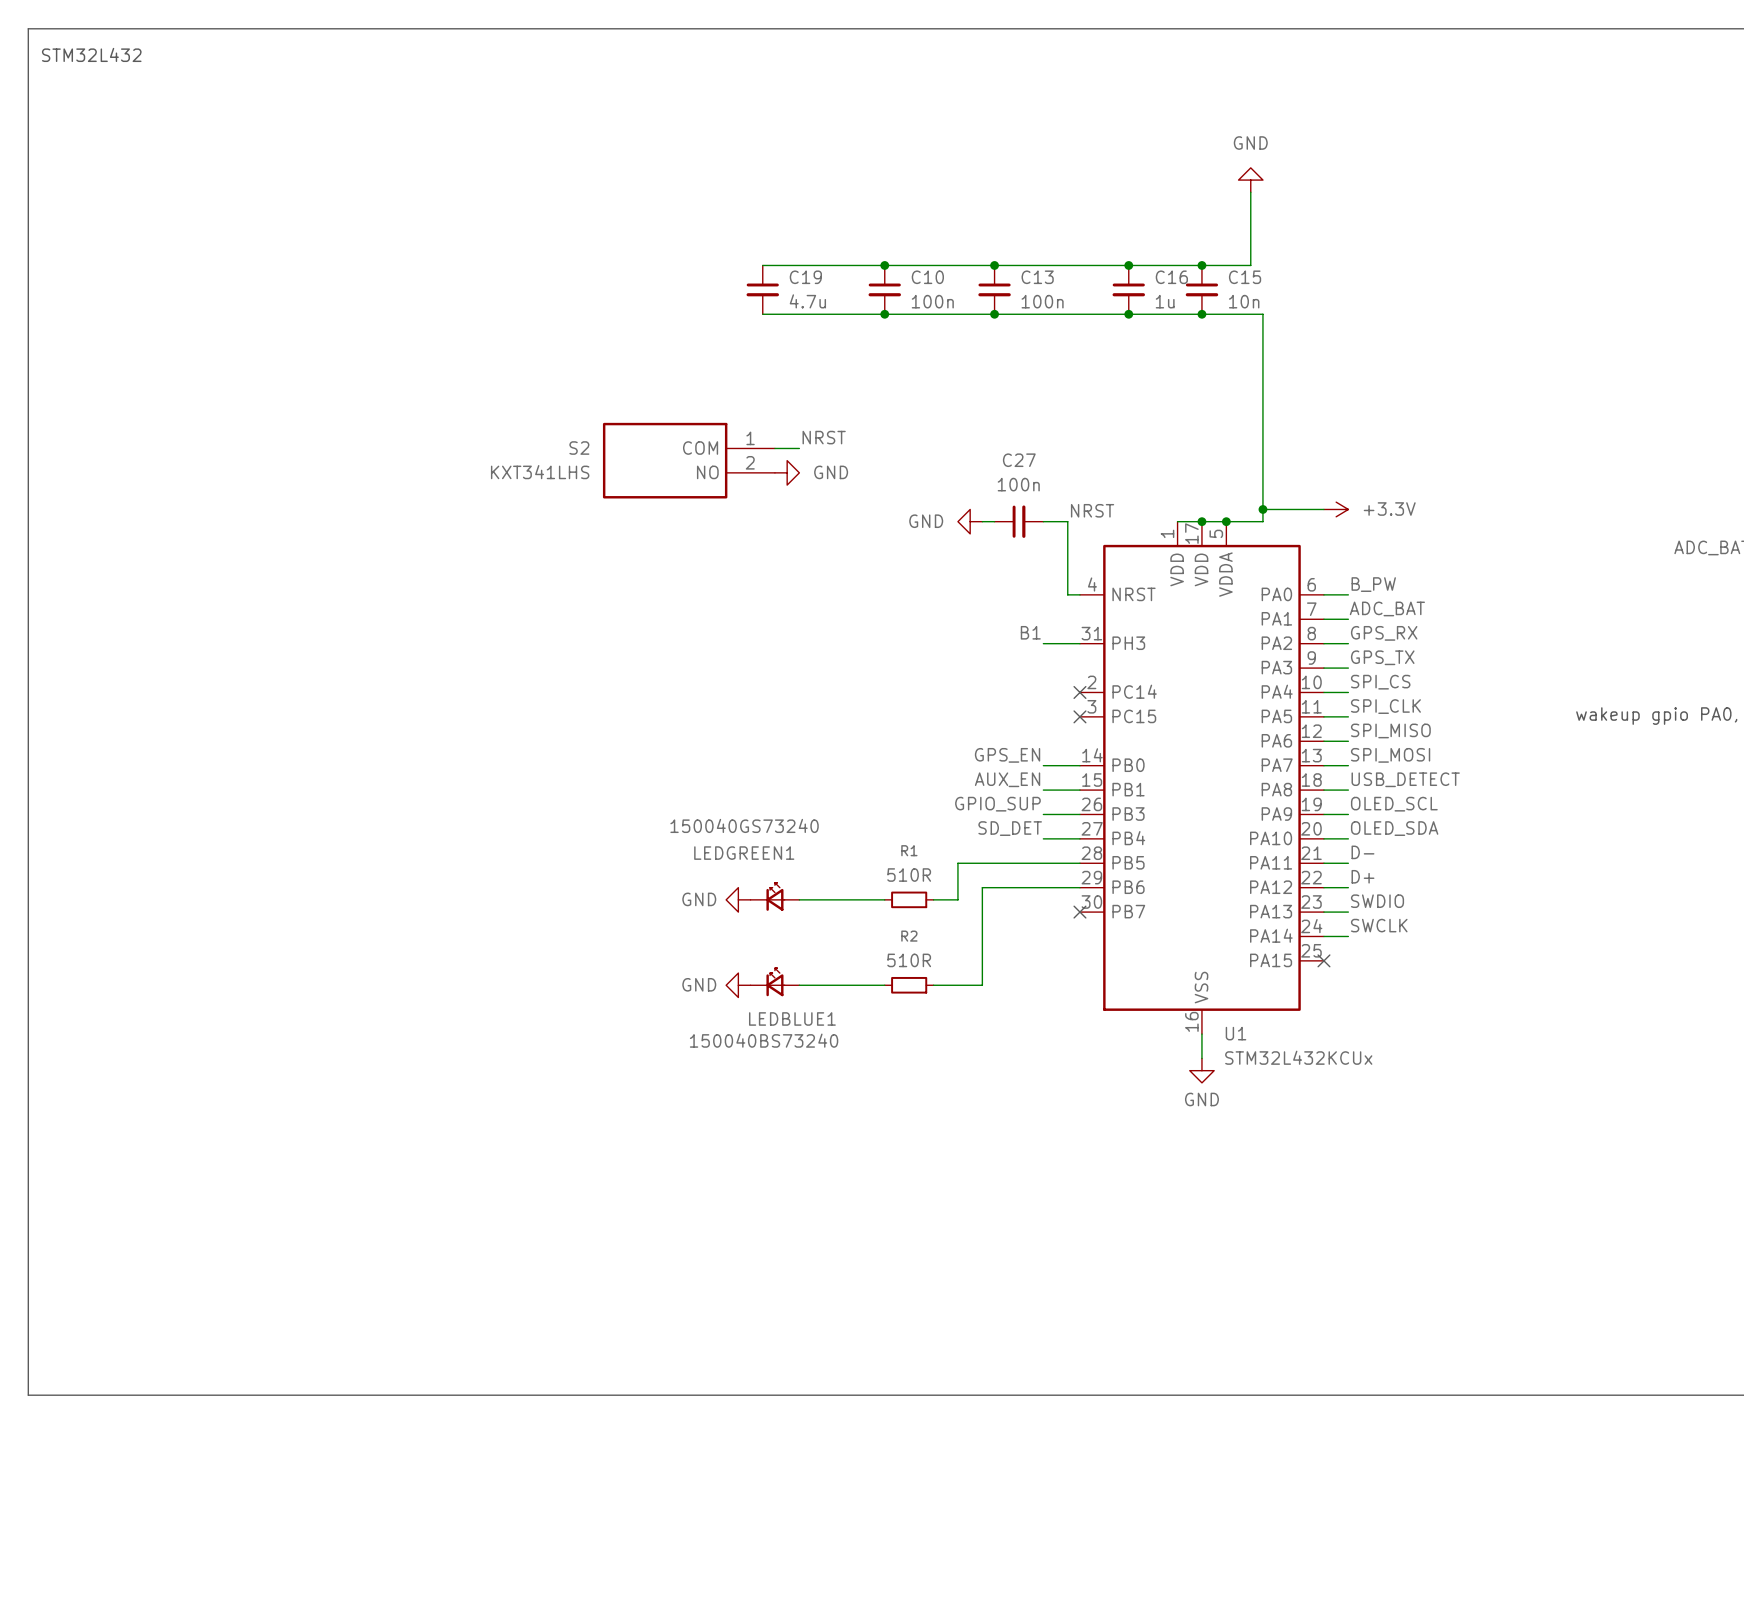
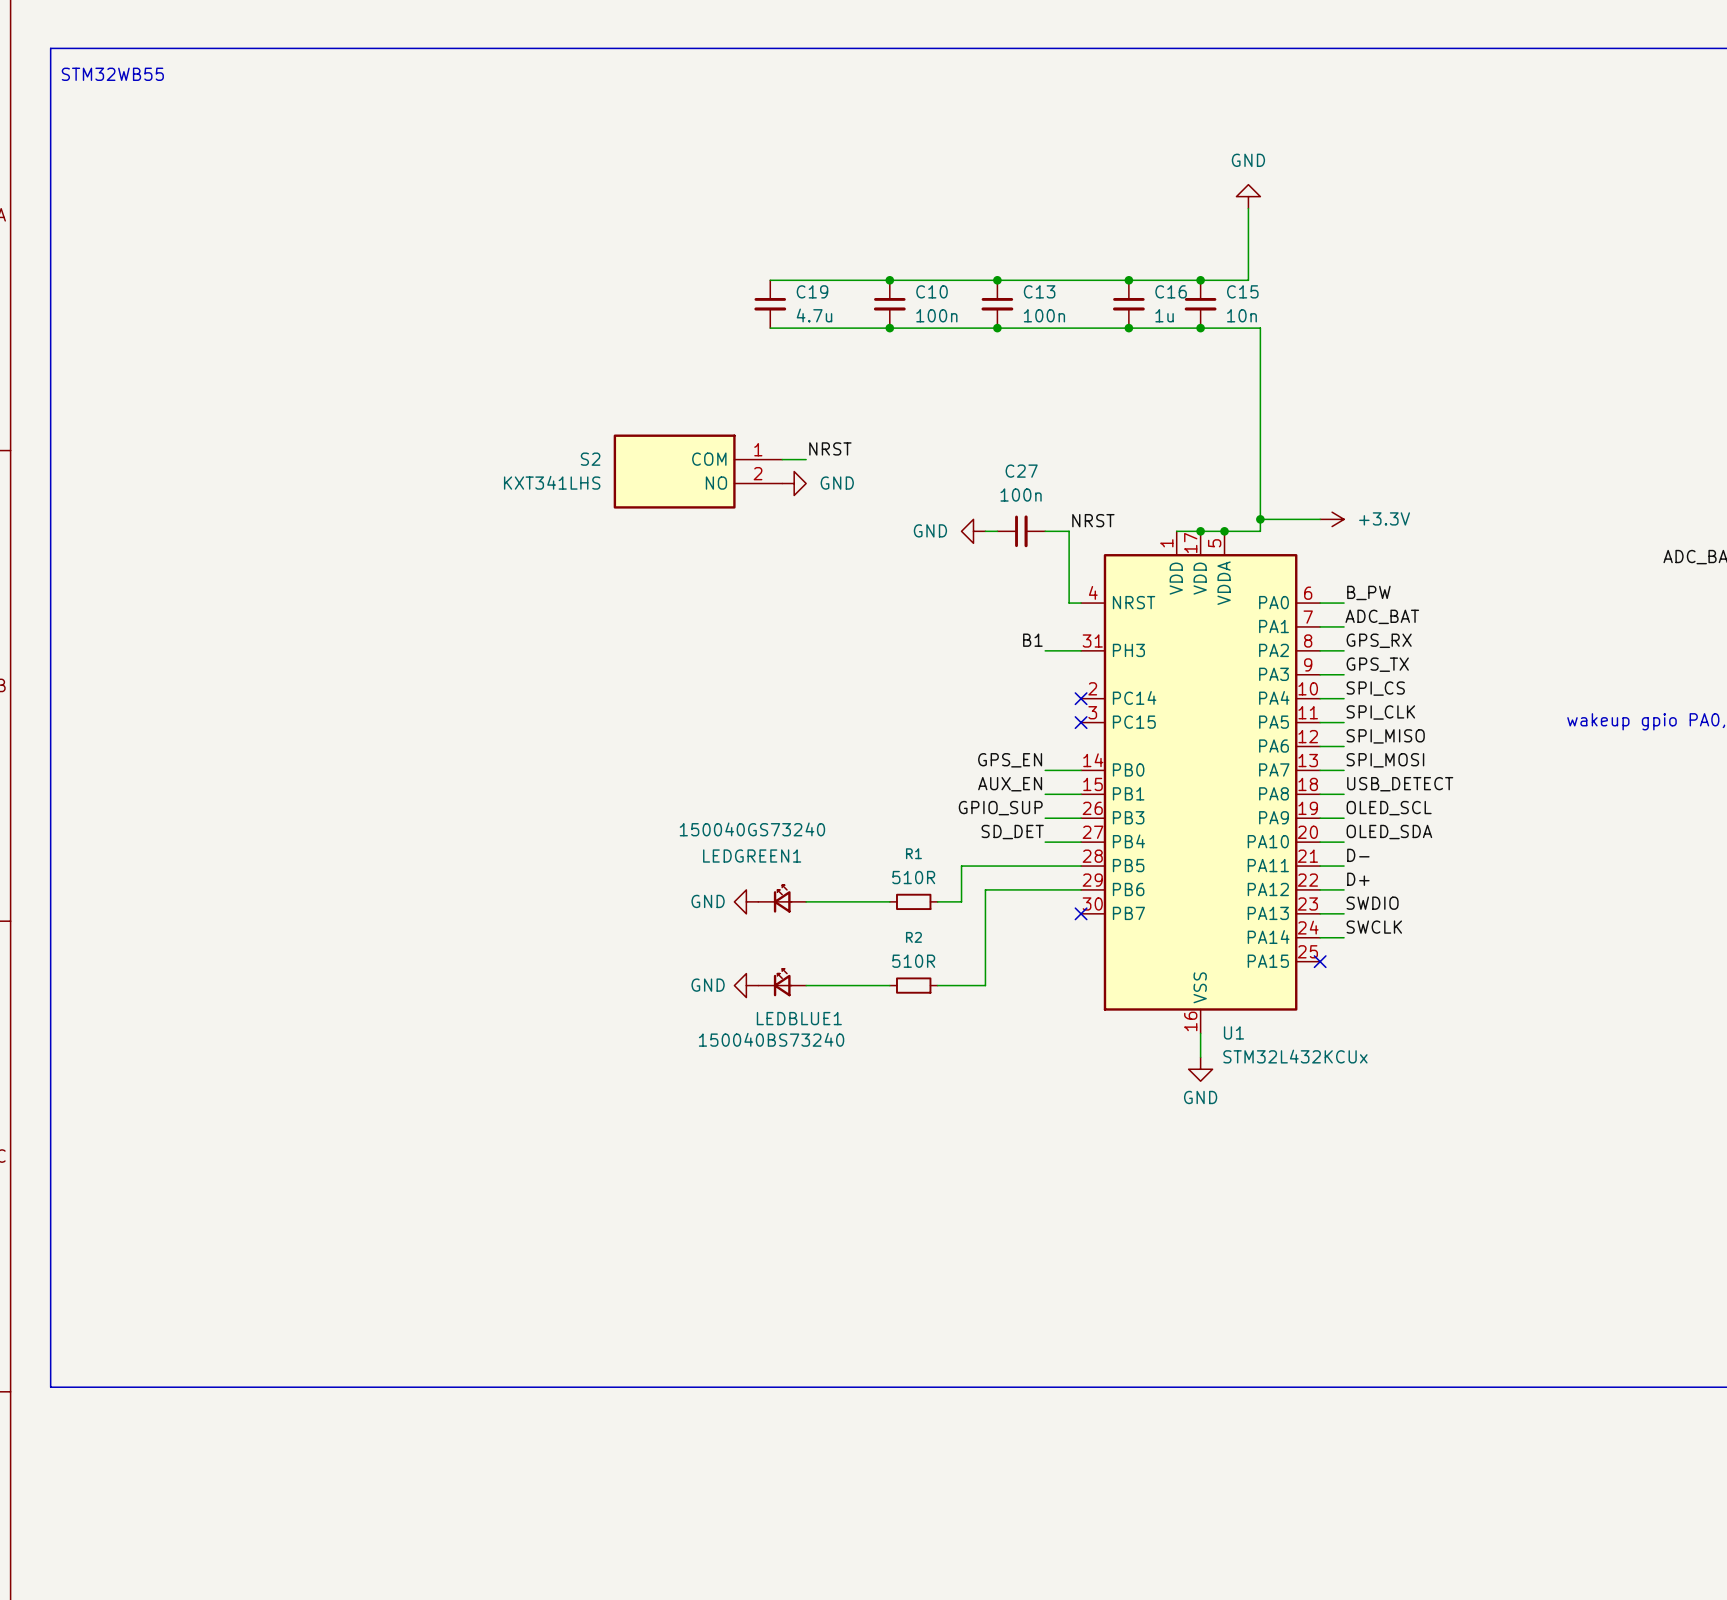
text: STM32L432 (91, 54) -> STM32WB55 (112, 74)

